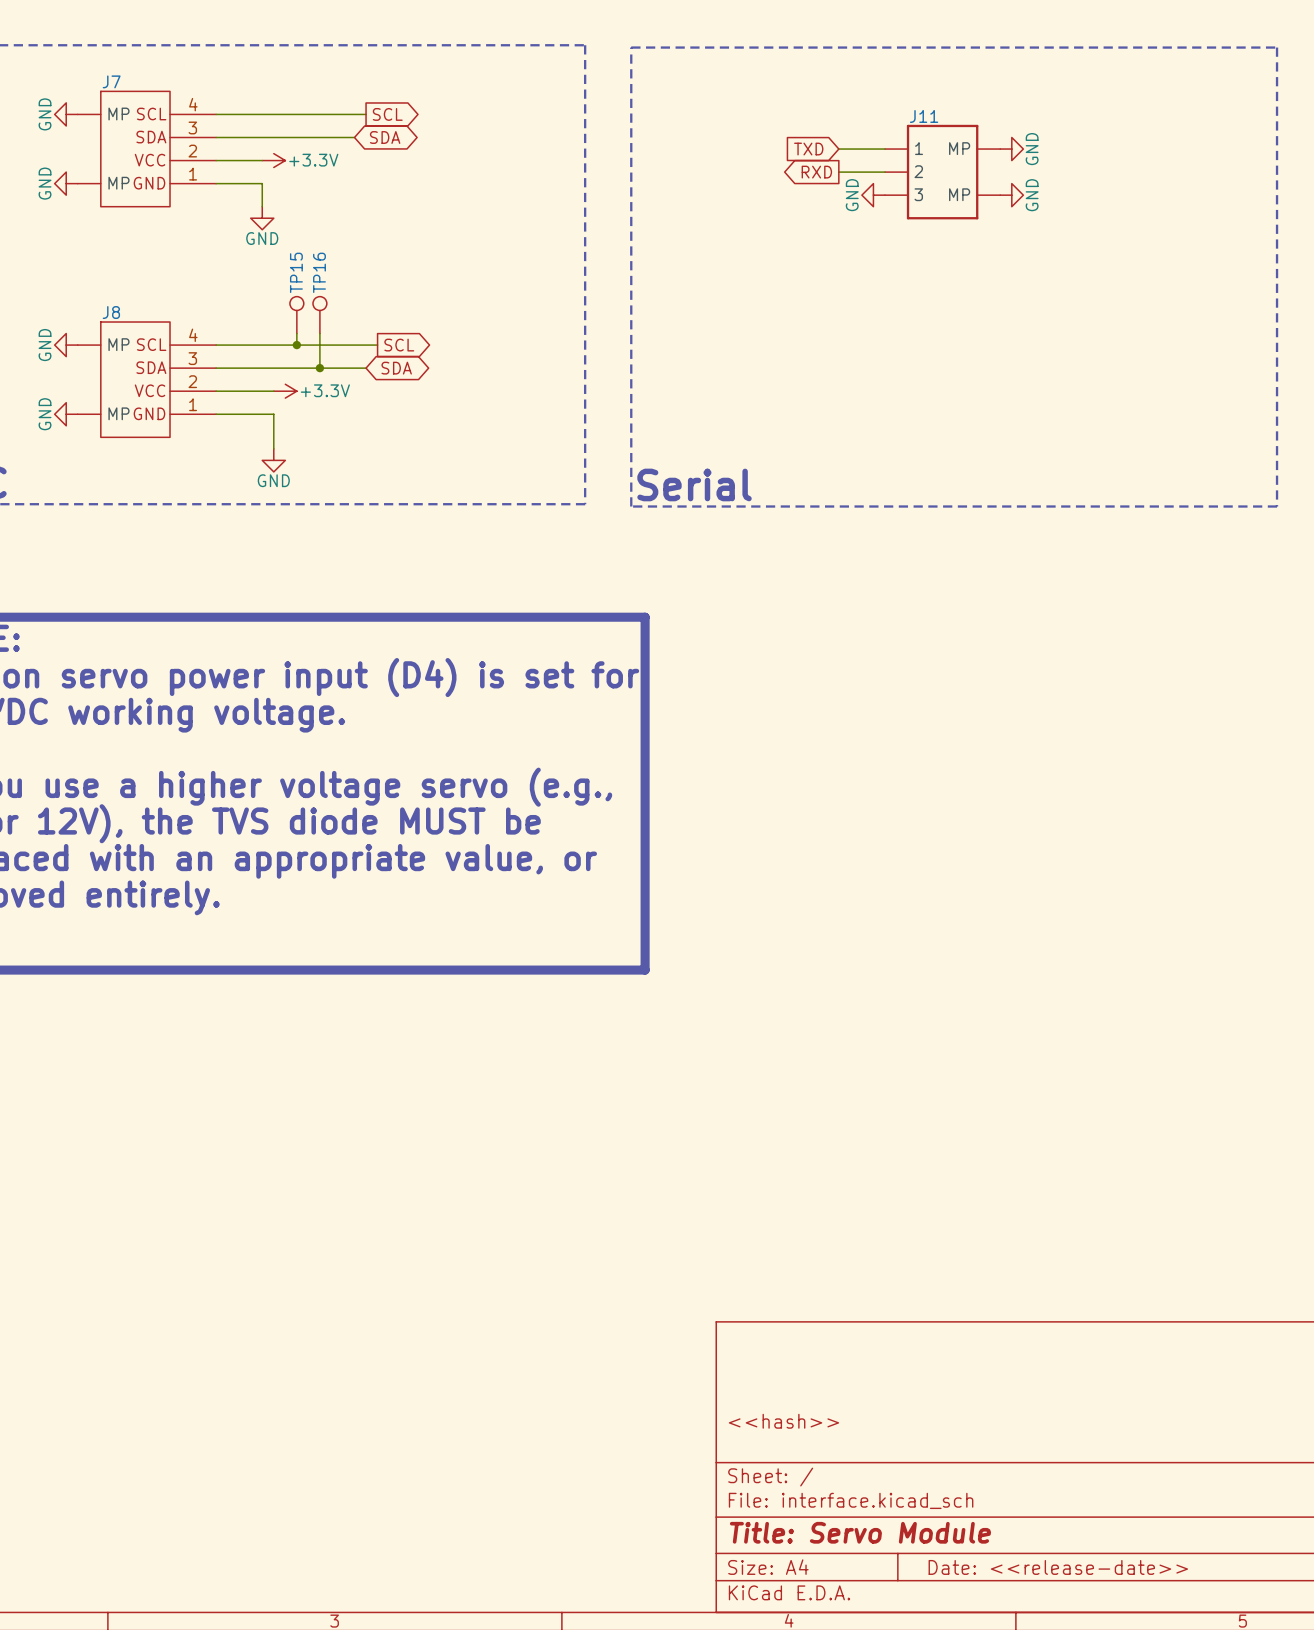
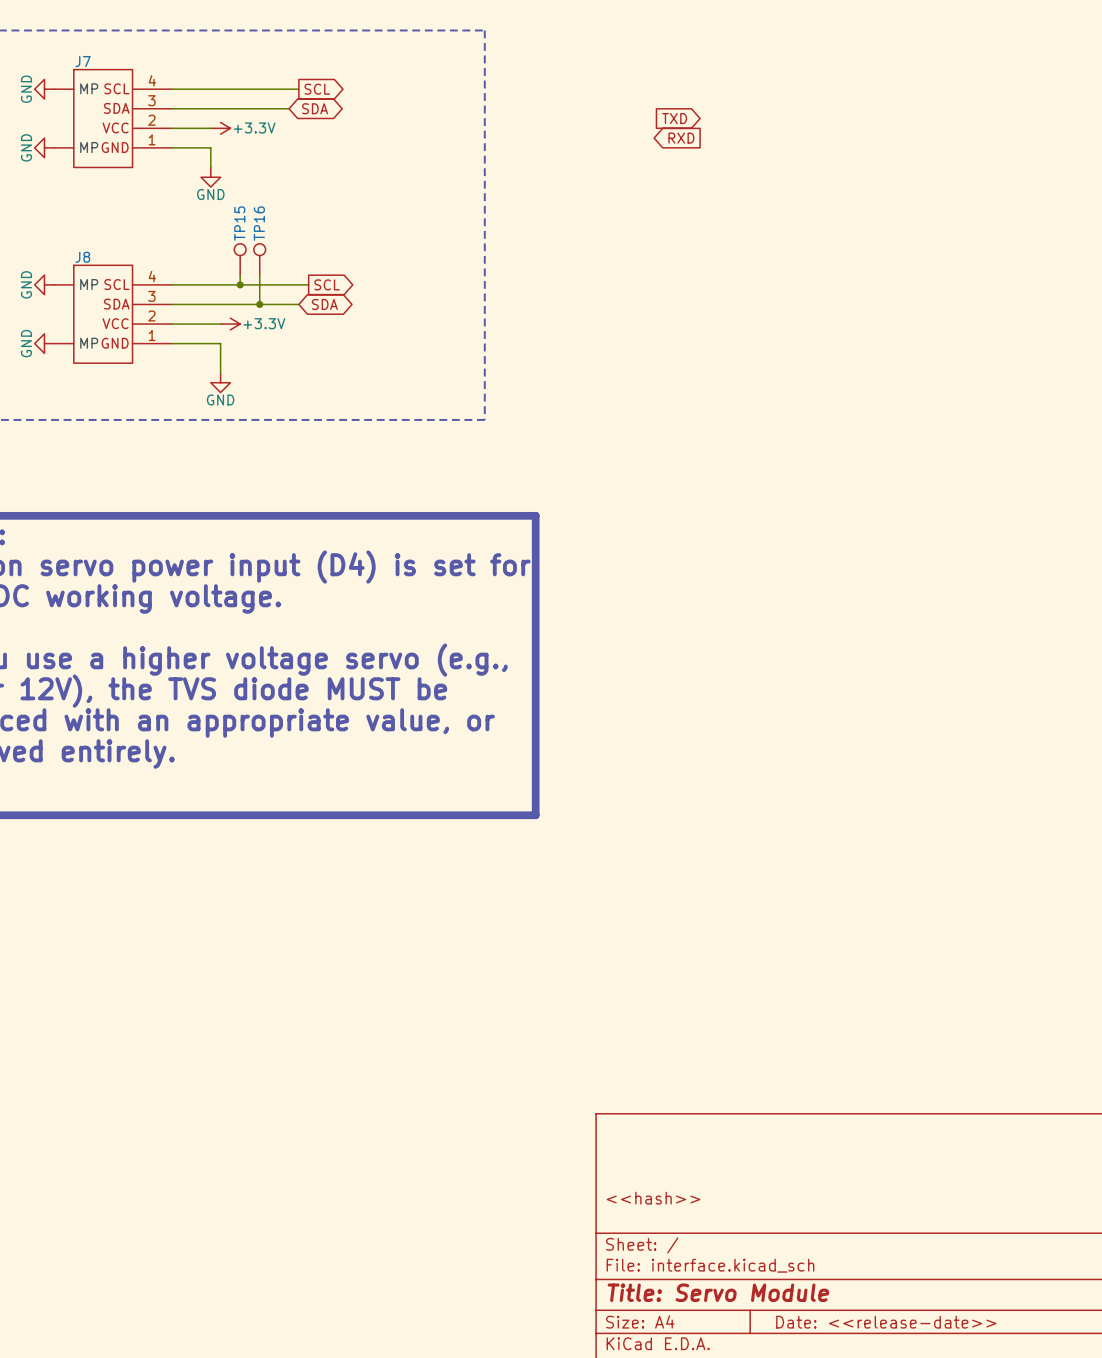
line: (631, 47) (1277, 47) (1277, 506) (631, 506) (631, 47) -> none
wire: (838, 149) (884, 149) -> none
power symbol: GND (1011, 149) -> none
wire: (838, 172) (884, 172) -> none
J11: (942, 172) -> none
power symbol: GND (873, 195) -> none
power symbol: GND (1011, 195) -> none
text: Serial (694, 484) -> none

